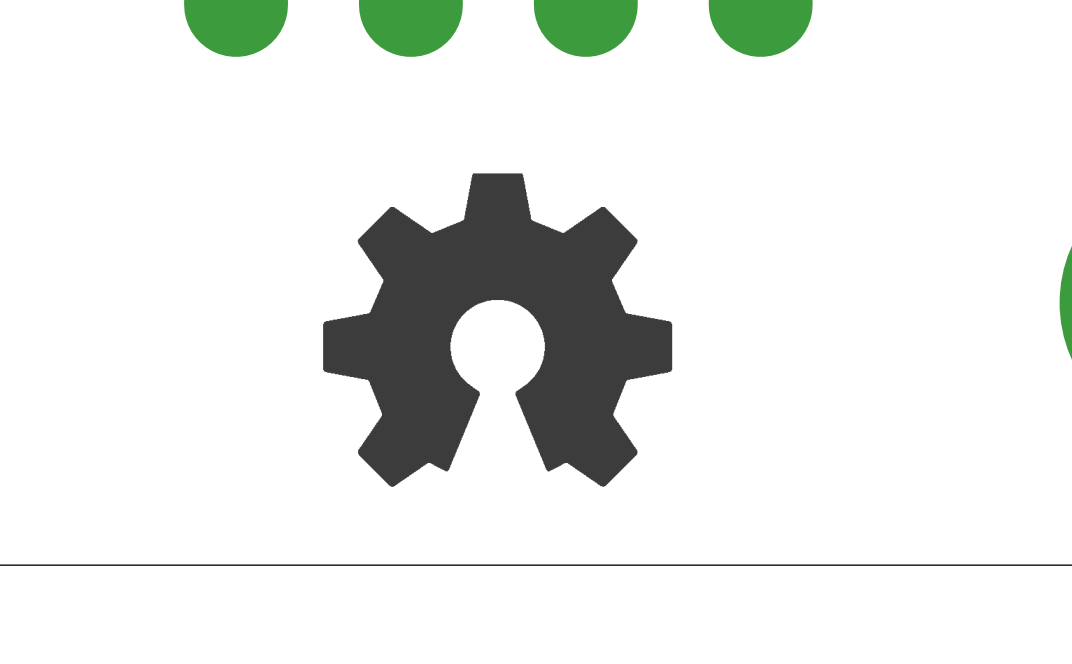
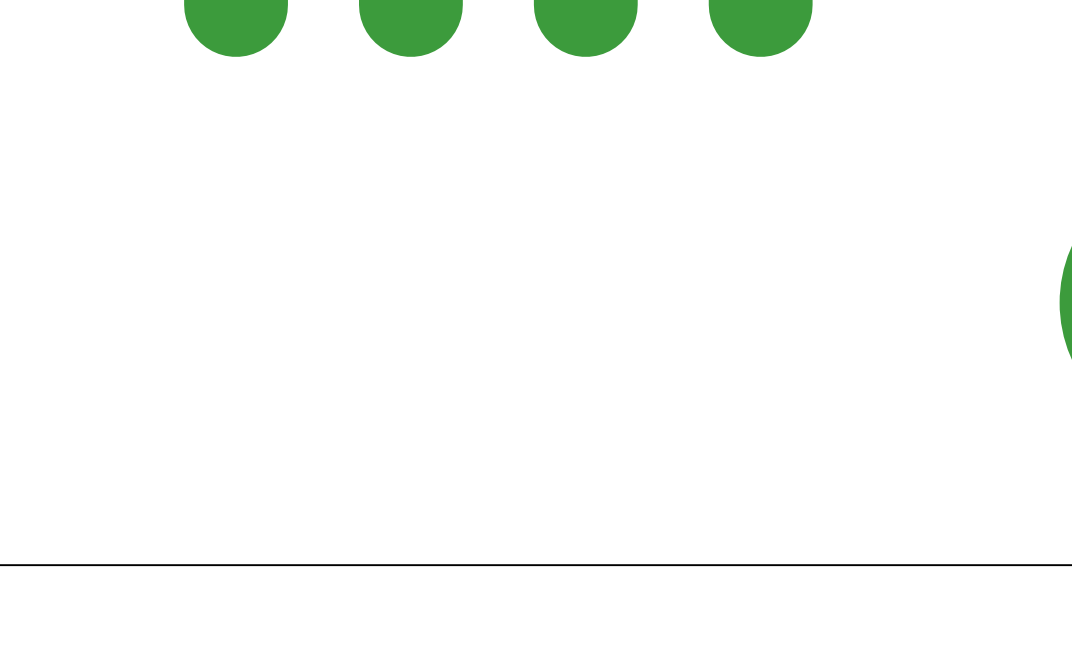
drawing: [323, 173, 673, 487] -> none

